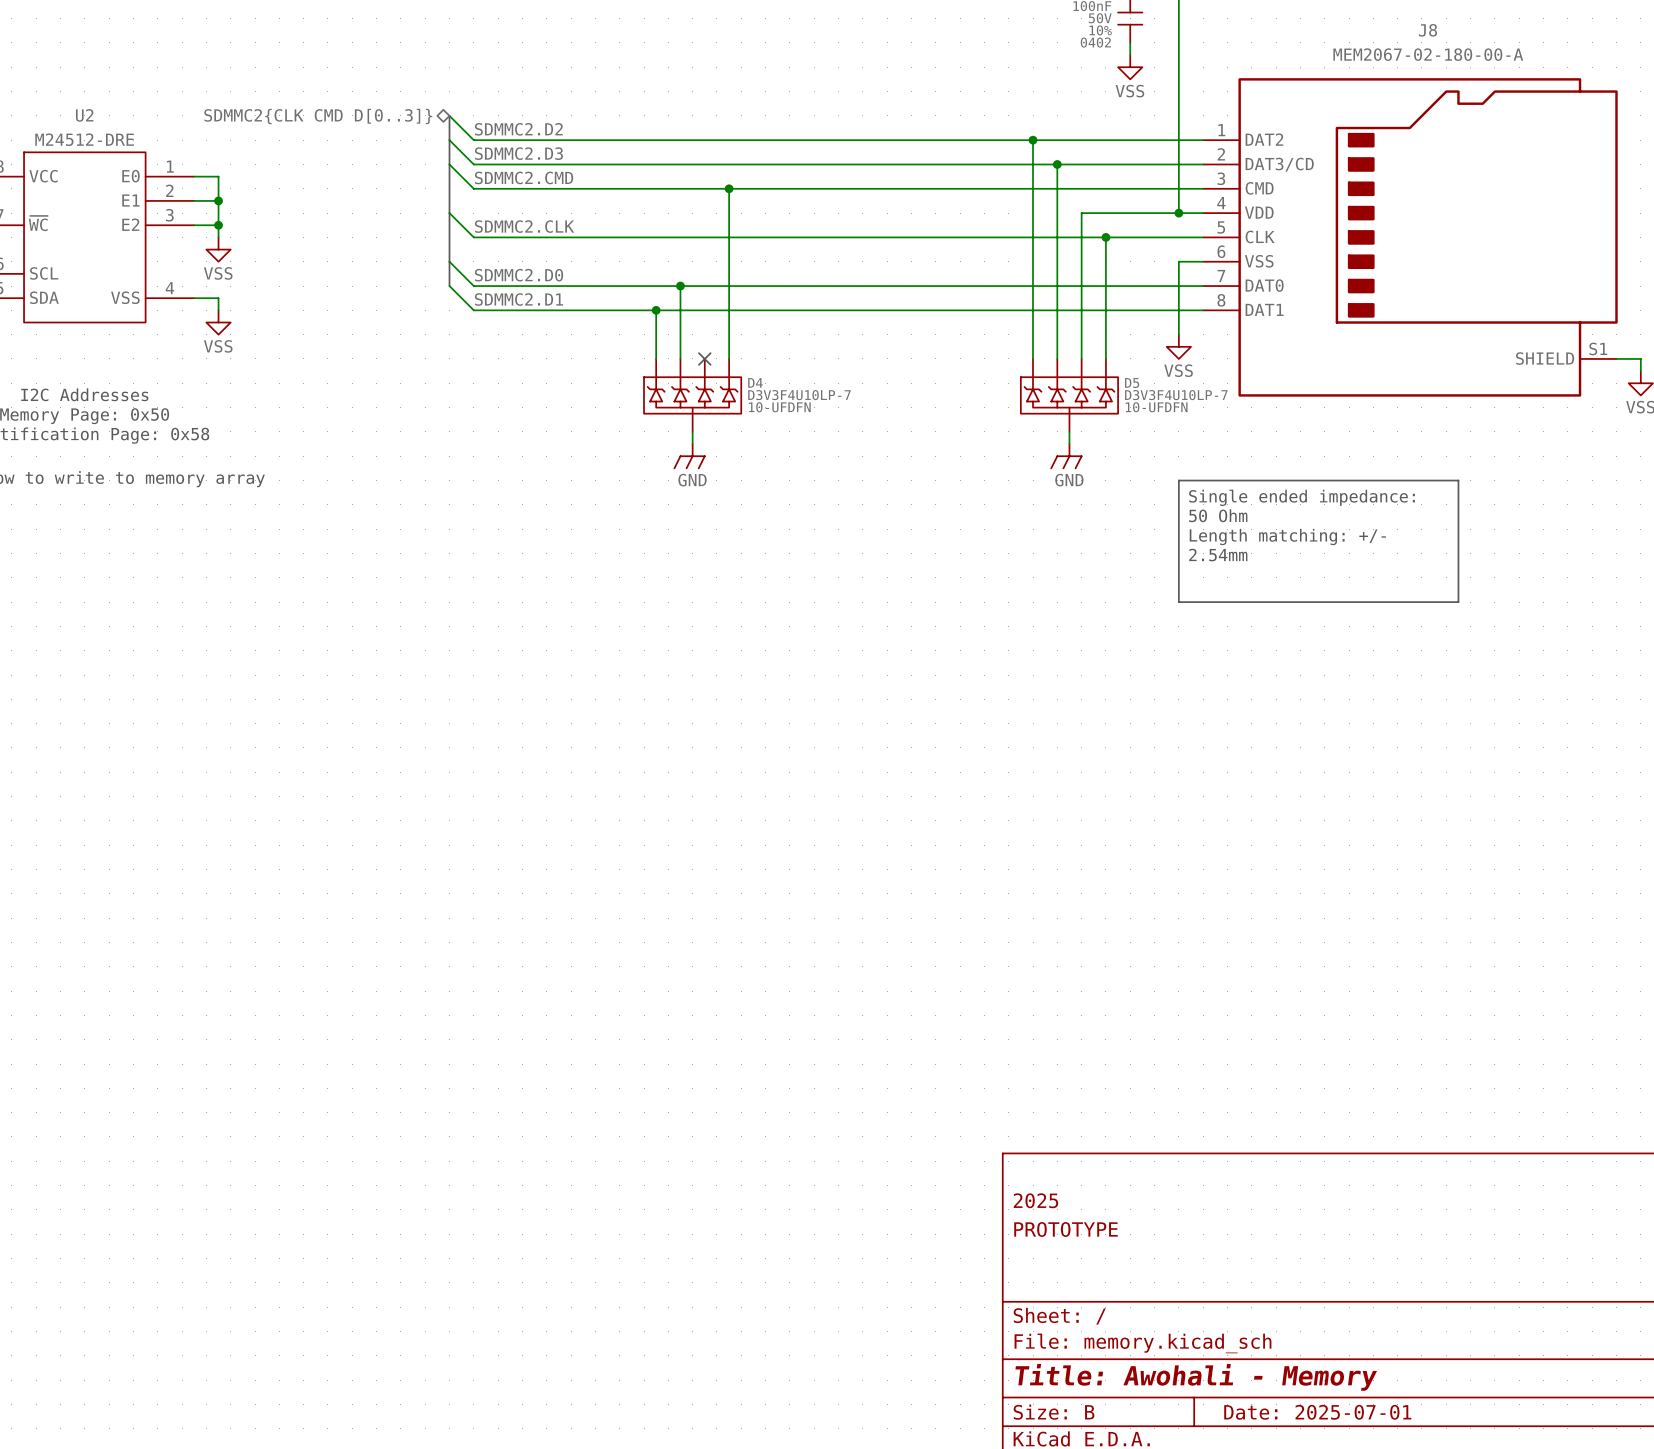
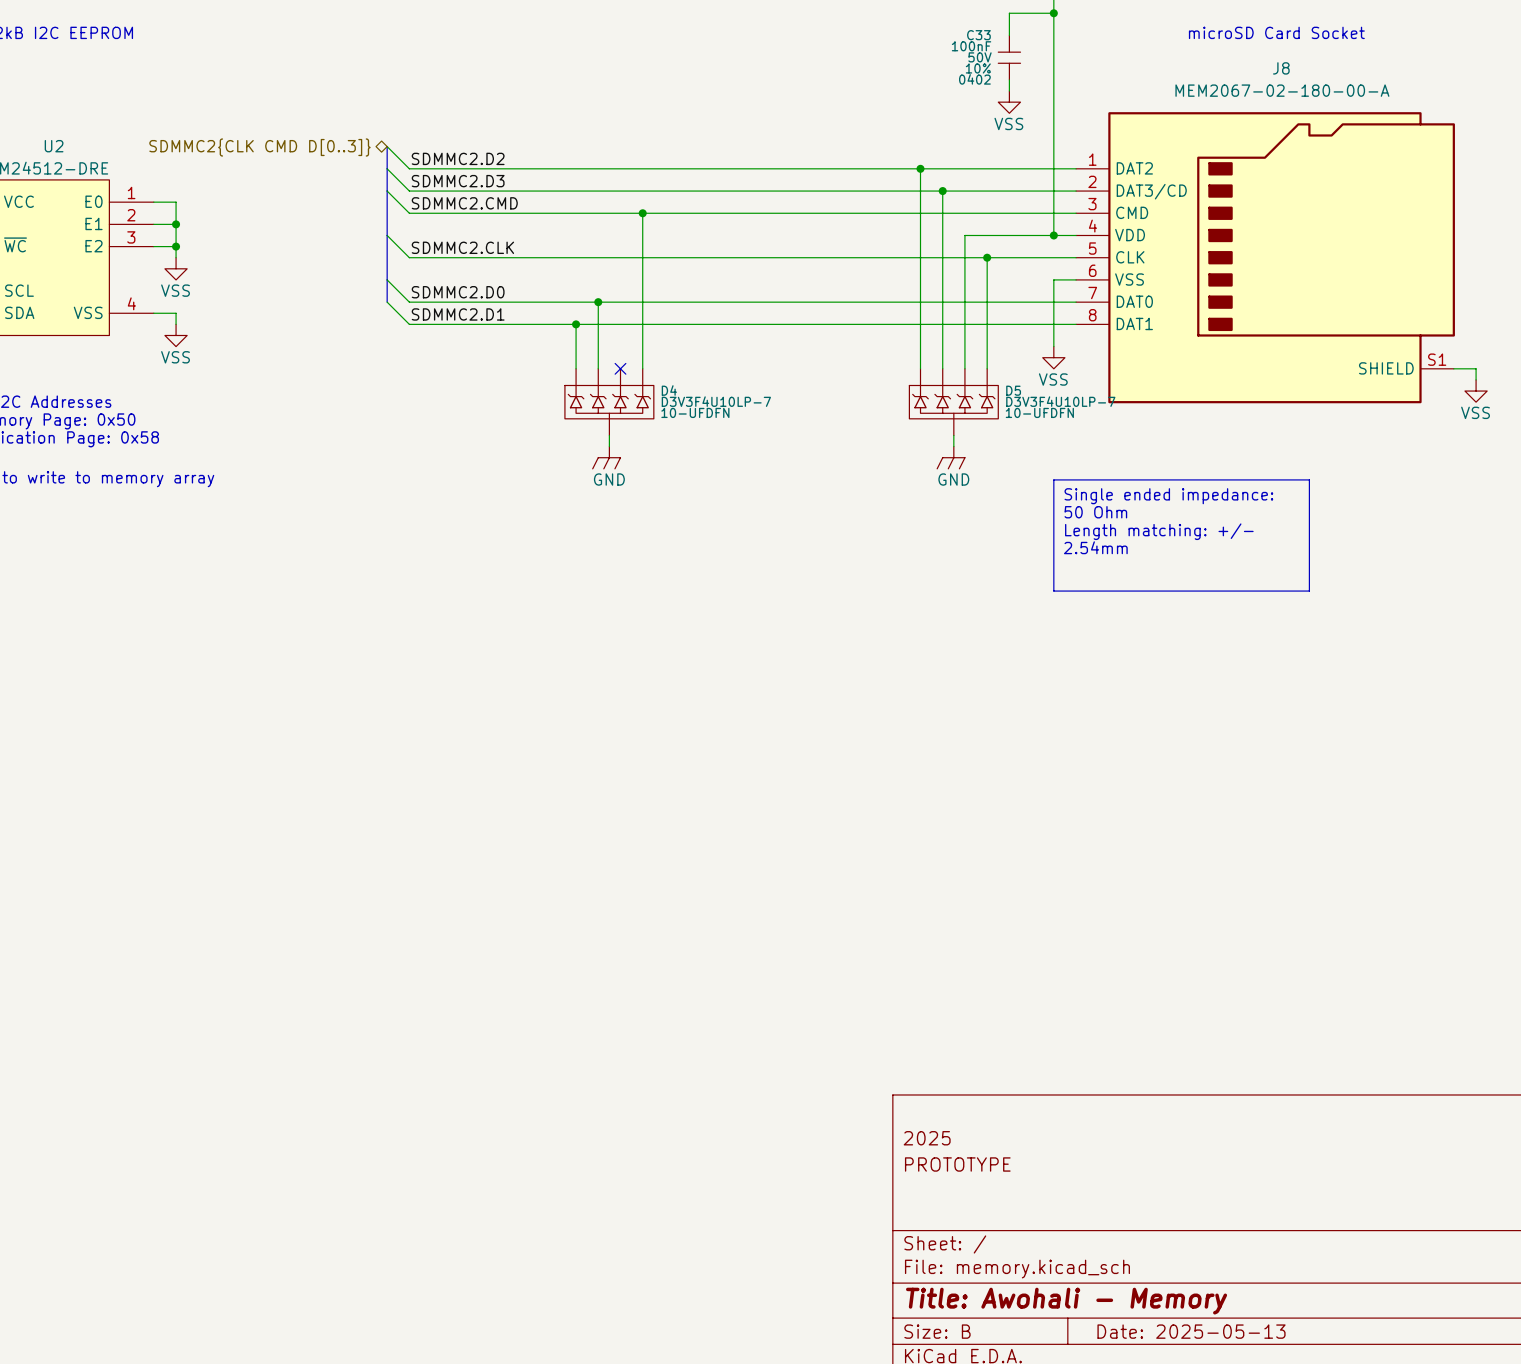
title block: Date: 2025-07-01 (1317, 1412) -> Date: 2025-05-13 (1191, 1331)

